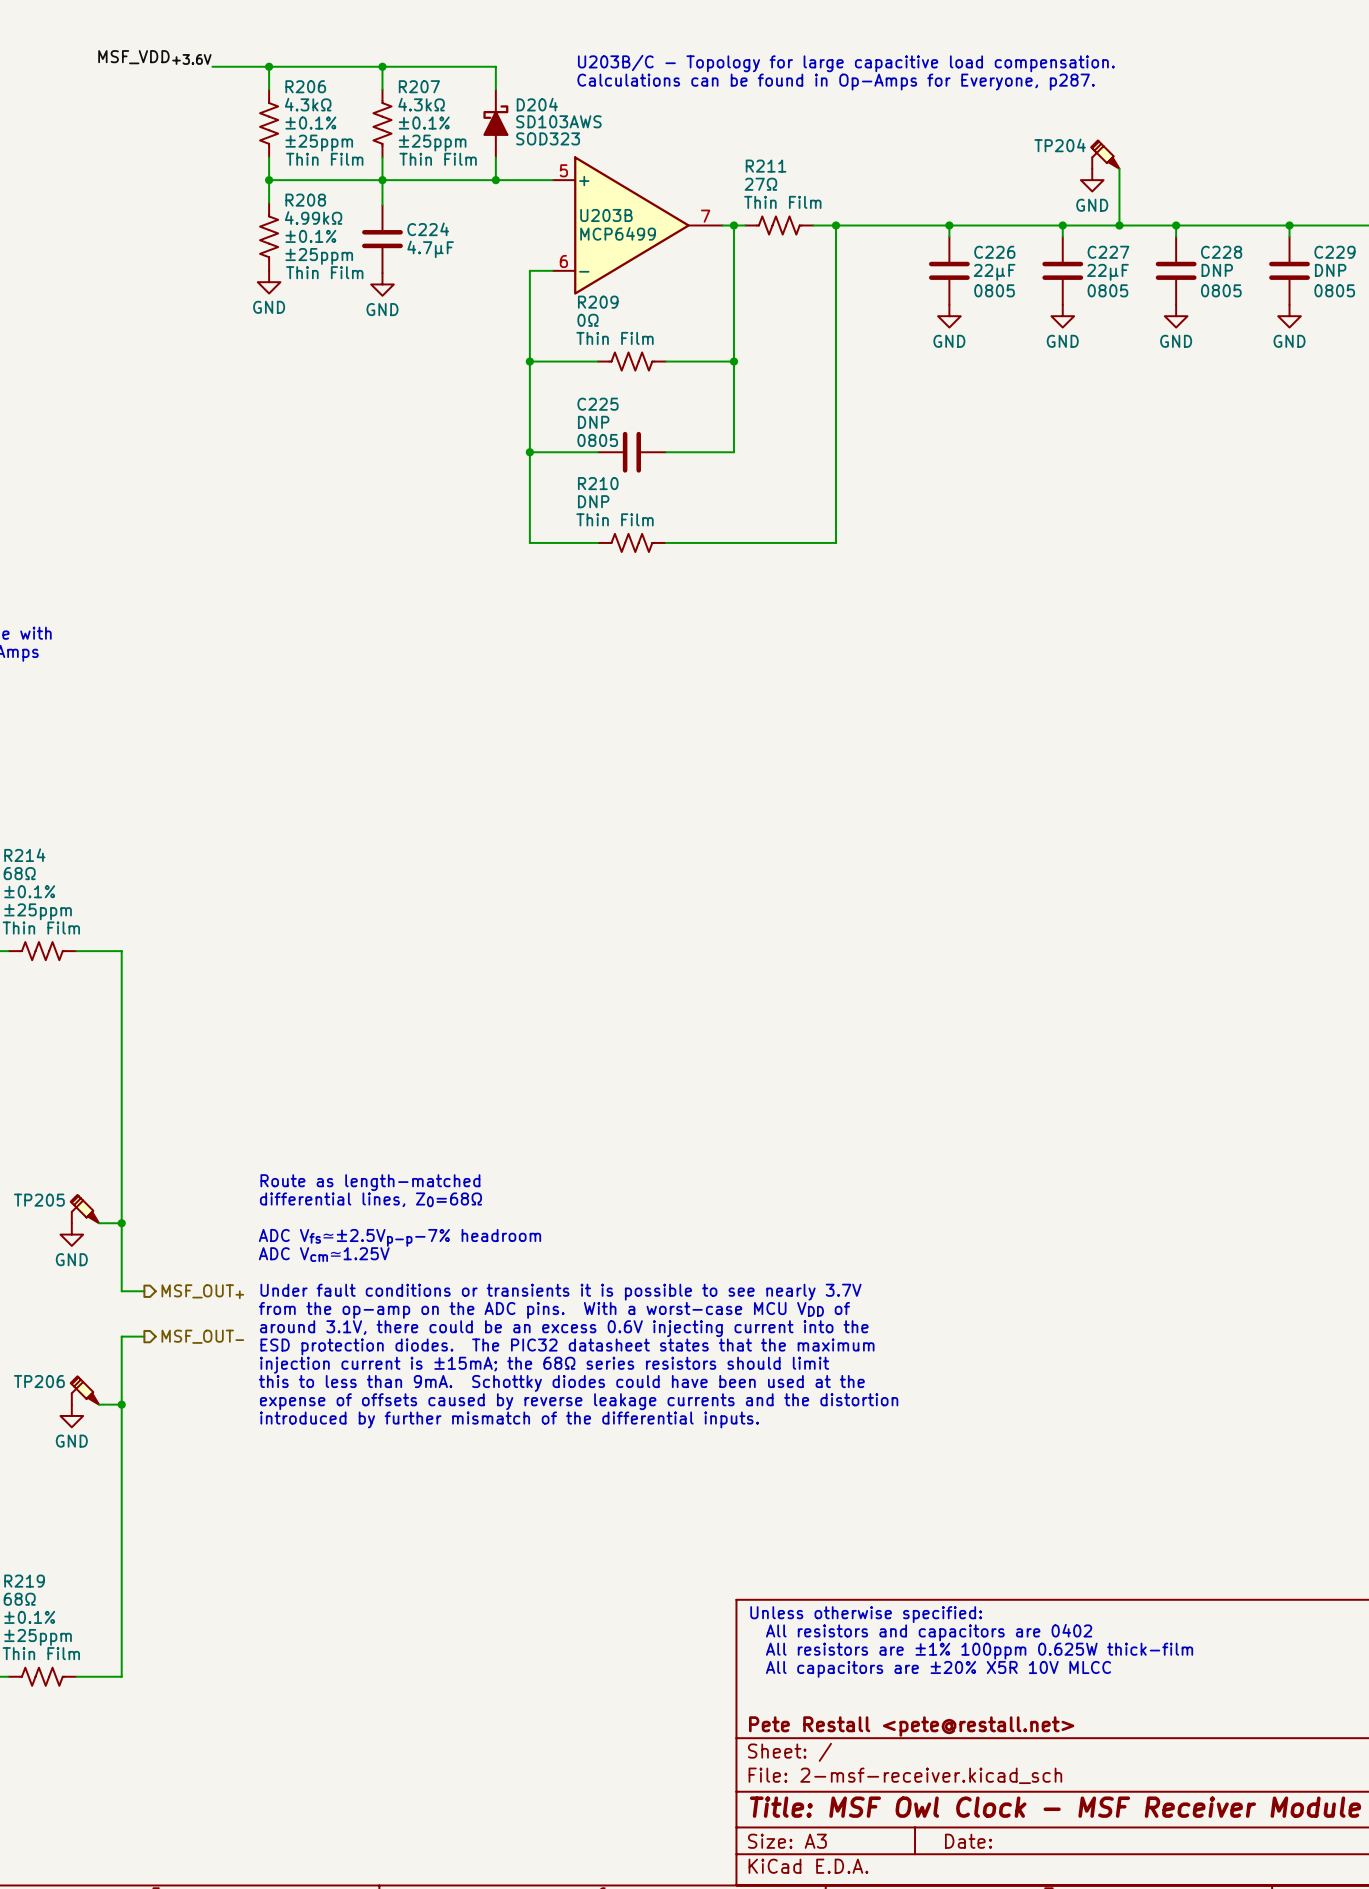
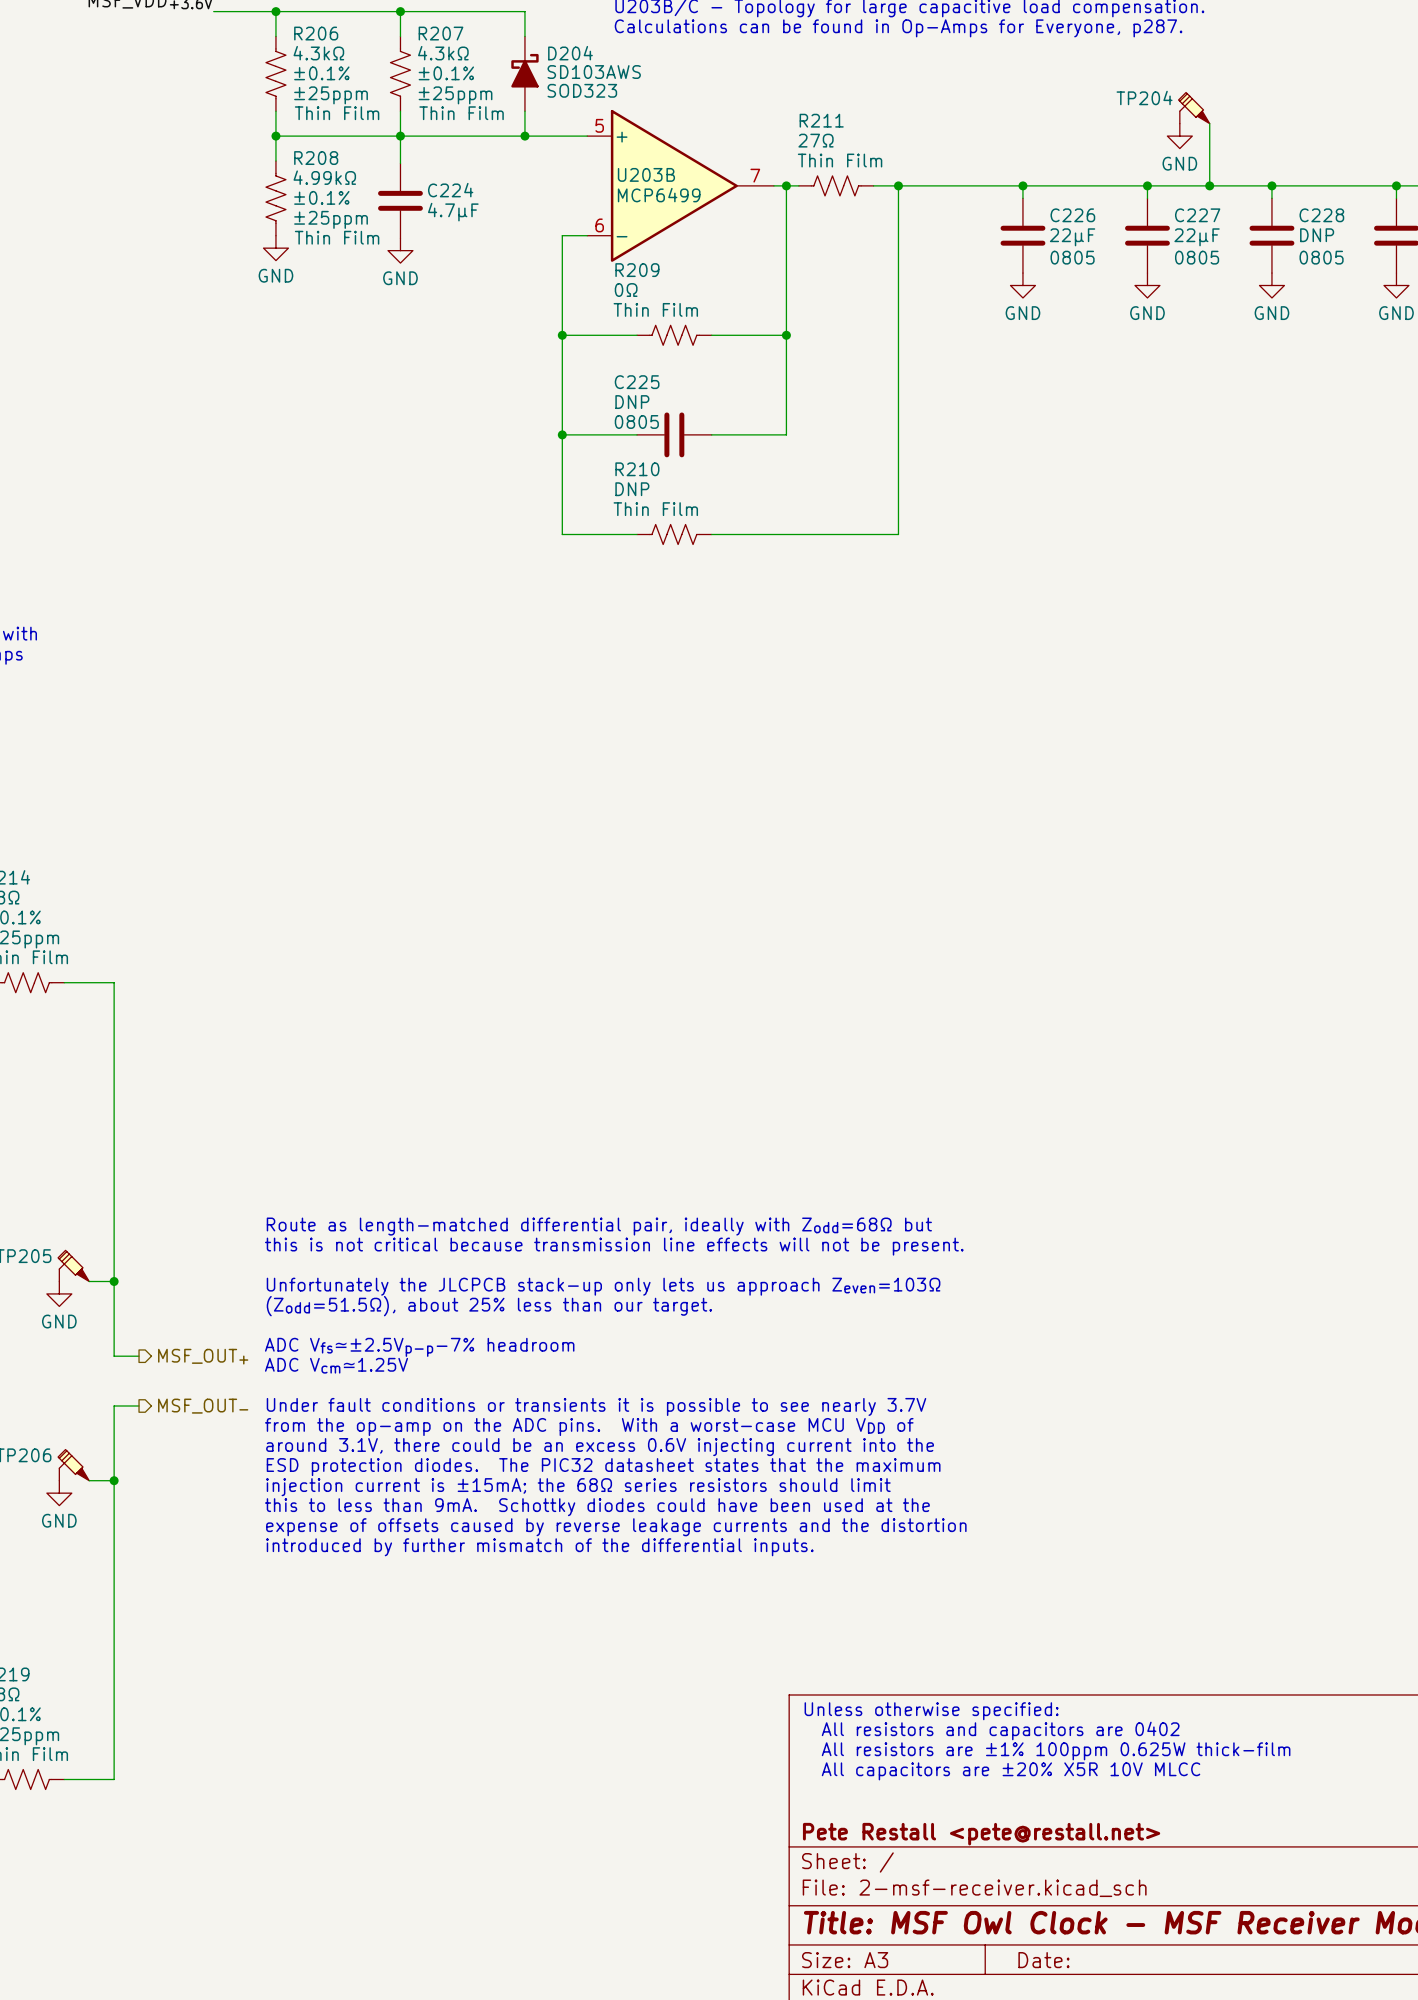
text: none -> Route as length-matched differential pair, ideally with Zodd=68Ω but (599, 1226)
text: Route as length-matched (370, 1182) -> none
text: none -> this is not critical because transmission line effects will not be present. (614, 1246)
text: differential lines, Z0=68Ω (370, 1199) -> none
text: none -> Unfortunately the JLCPCB stack-up only lets us approach Zeven=103Ω (603, 1286)
text position: ADC Vfs≃±2.5Vp-p-7% headroom (399, 1237) -> ADC Vfs≃±2.5Vp-p-7% headroom (419, 1347)
text: none -> (Zodd=51.5Ω), about 25% less than our target. (489, 1306)
text position: ADC Vcm≃1.25V (324, 1254) -> ADC Vcm≃1.25V (336, 1365)
text position: Under fault conditions or transients it is possible to see nearly 3.7V (561, 1292) -> Under fault conditions or transients it is possible to see nearly 3.7V (596, 1406)
text position: from the op-amp on the ADC pins. With a worst-case MCU VDD of (554, 1310) -> from the op-amp on the ADC pins. With a worst-case MCU VDD of (589, 1427)
text position: around 3.1V, there could be an excess 0.6V injecting current into the (564, 1328) -> around 3.1V, there could be an excess 0.6V injecting current into the (600, 1447)
text position: ESD protection diodes. The PIC32 datasheet states that the maximum (567, 1346) -> ESD protection diodes. The PIC32 datasheet states that the maximum (603, 1467)
text position: injection current is ±15mA; the 68Ω series resistors should limit (544, 1365) -> injection current is ±15mA; the 68Ω series resistors should limit (578, 1487)
text position: this to less than 9mA. Schottky diodes could have been used at the (561, 1383) -> this to less than 9mA. Schottky diodes could have been used at the (597, 1507)
text position: expense of offsets caused by reverse leakage currents and the distortion (579, 1401) -> expense of offsets caused by reverse leakage currents and the distortion (616, 1527)
text position: introduced by further mismatch of the differential inputs. (509, 1419) -> introduced by further mismatch of the differential inputs. (539, 1547)

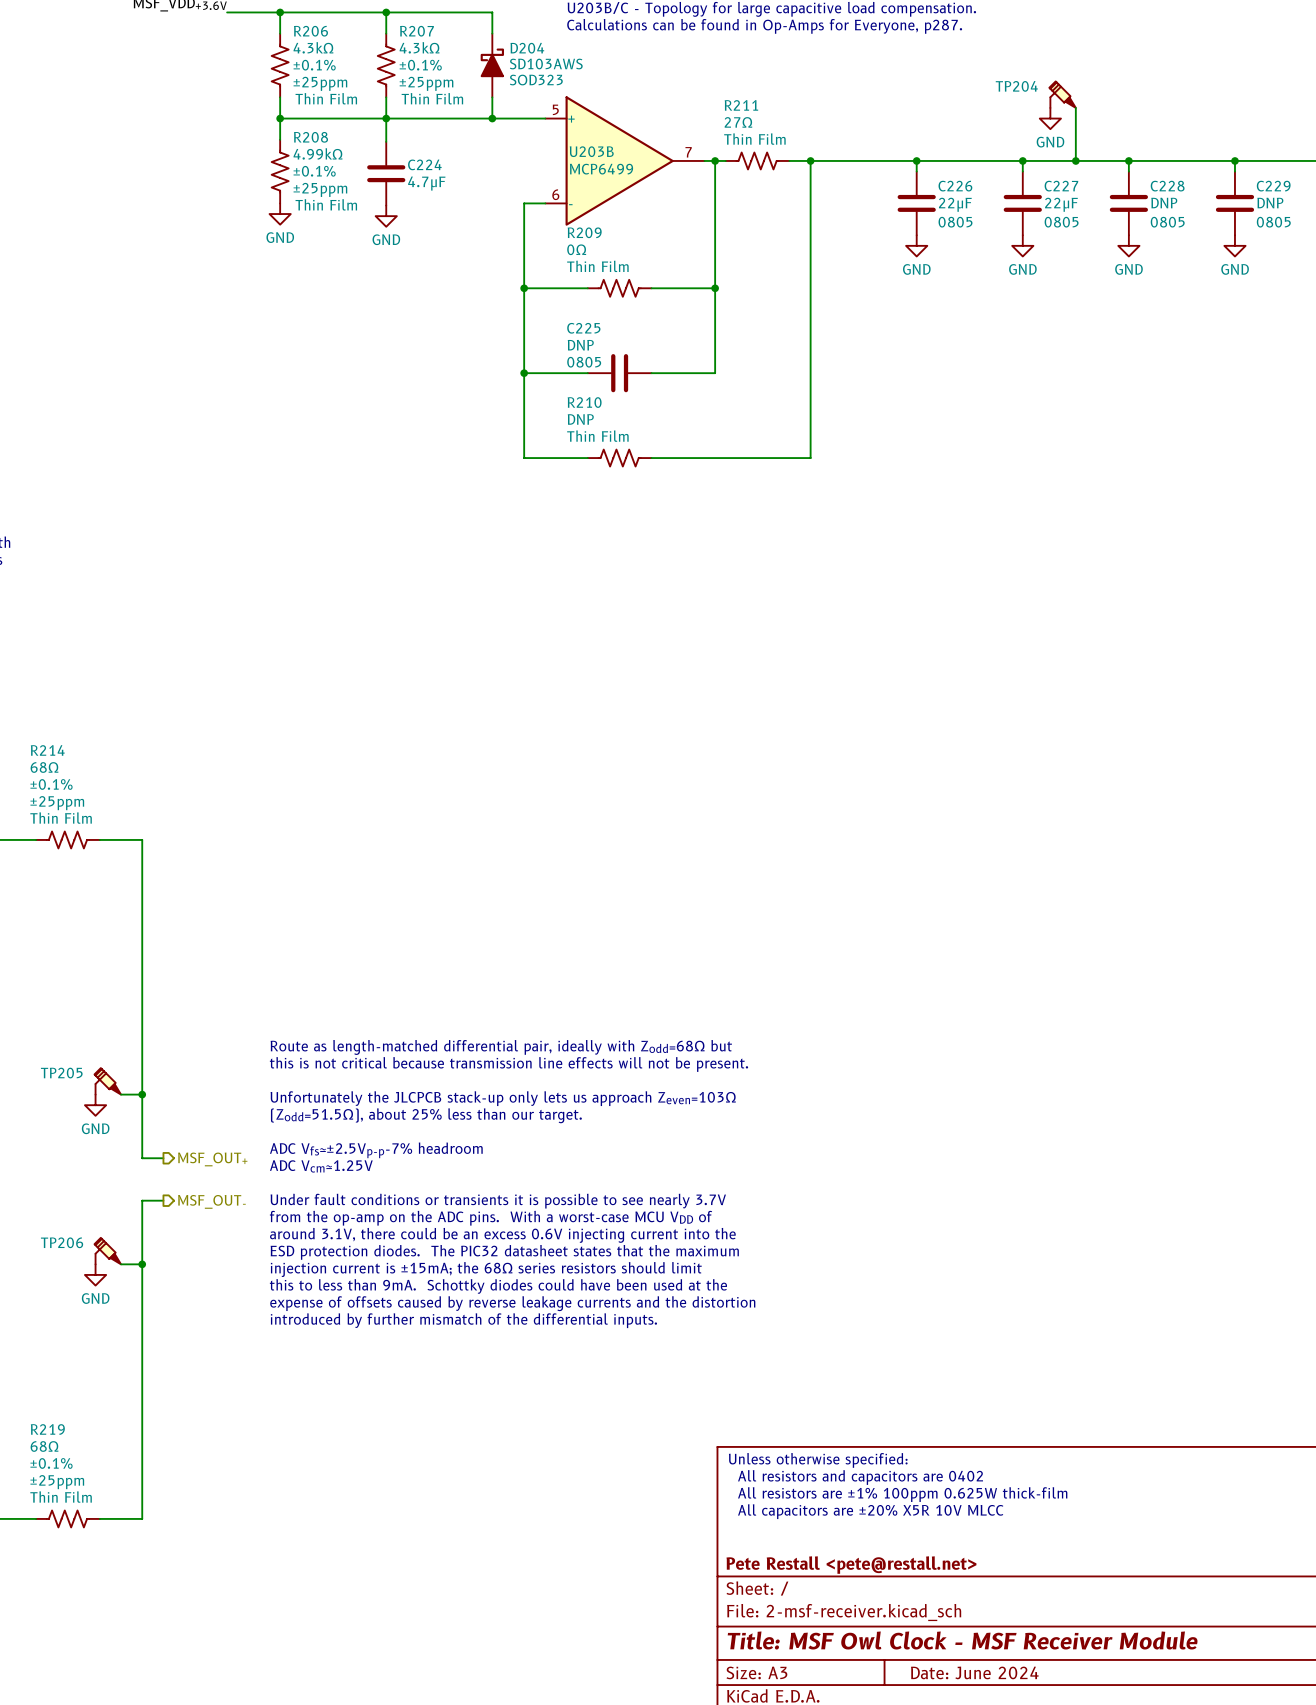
title block: Date: (1043, 1960) -> Date: June 2024 (974, 1672)

